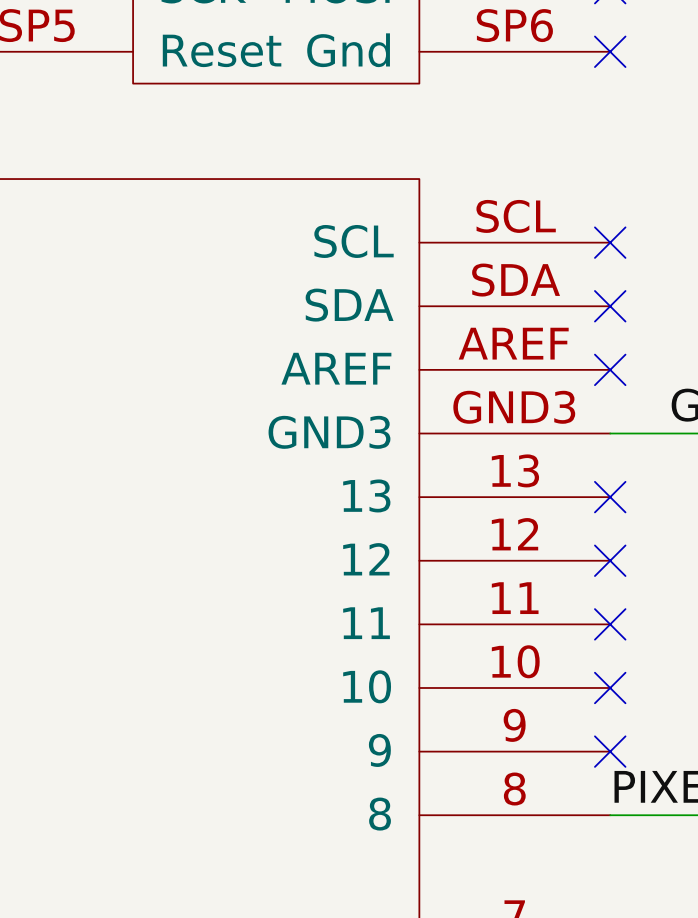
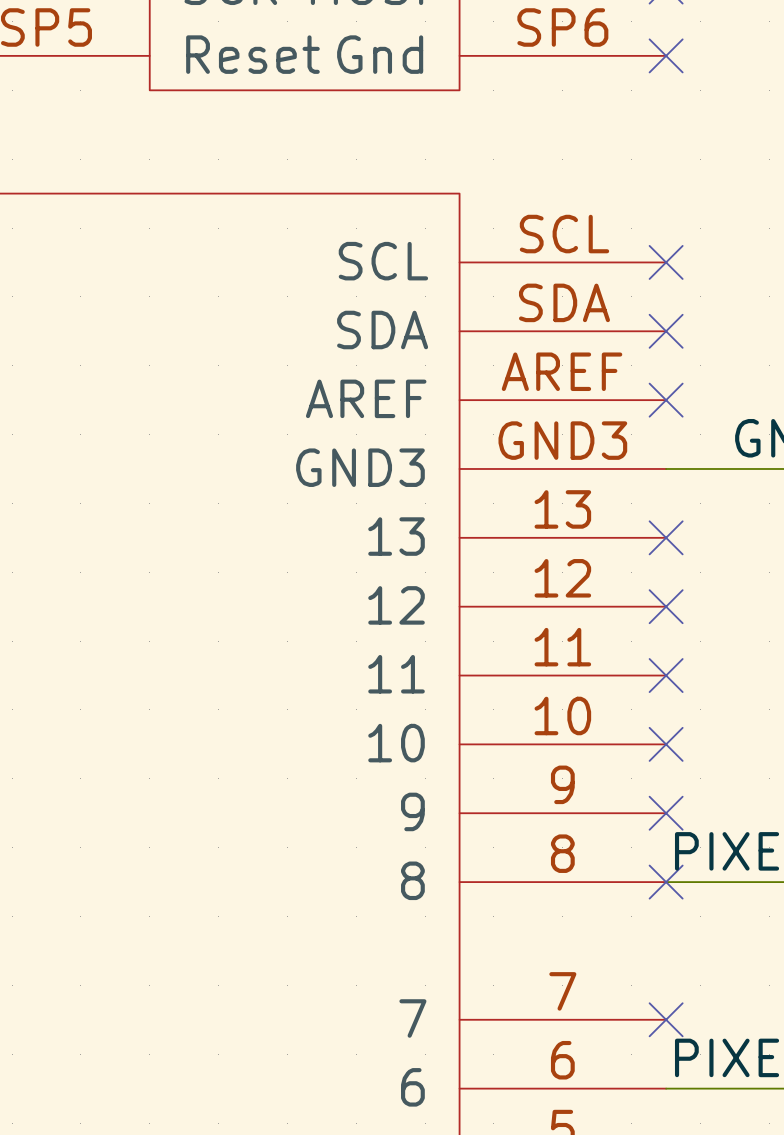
no-connect mark: none -> (666, 882)

